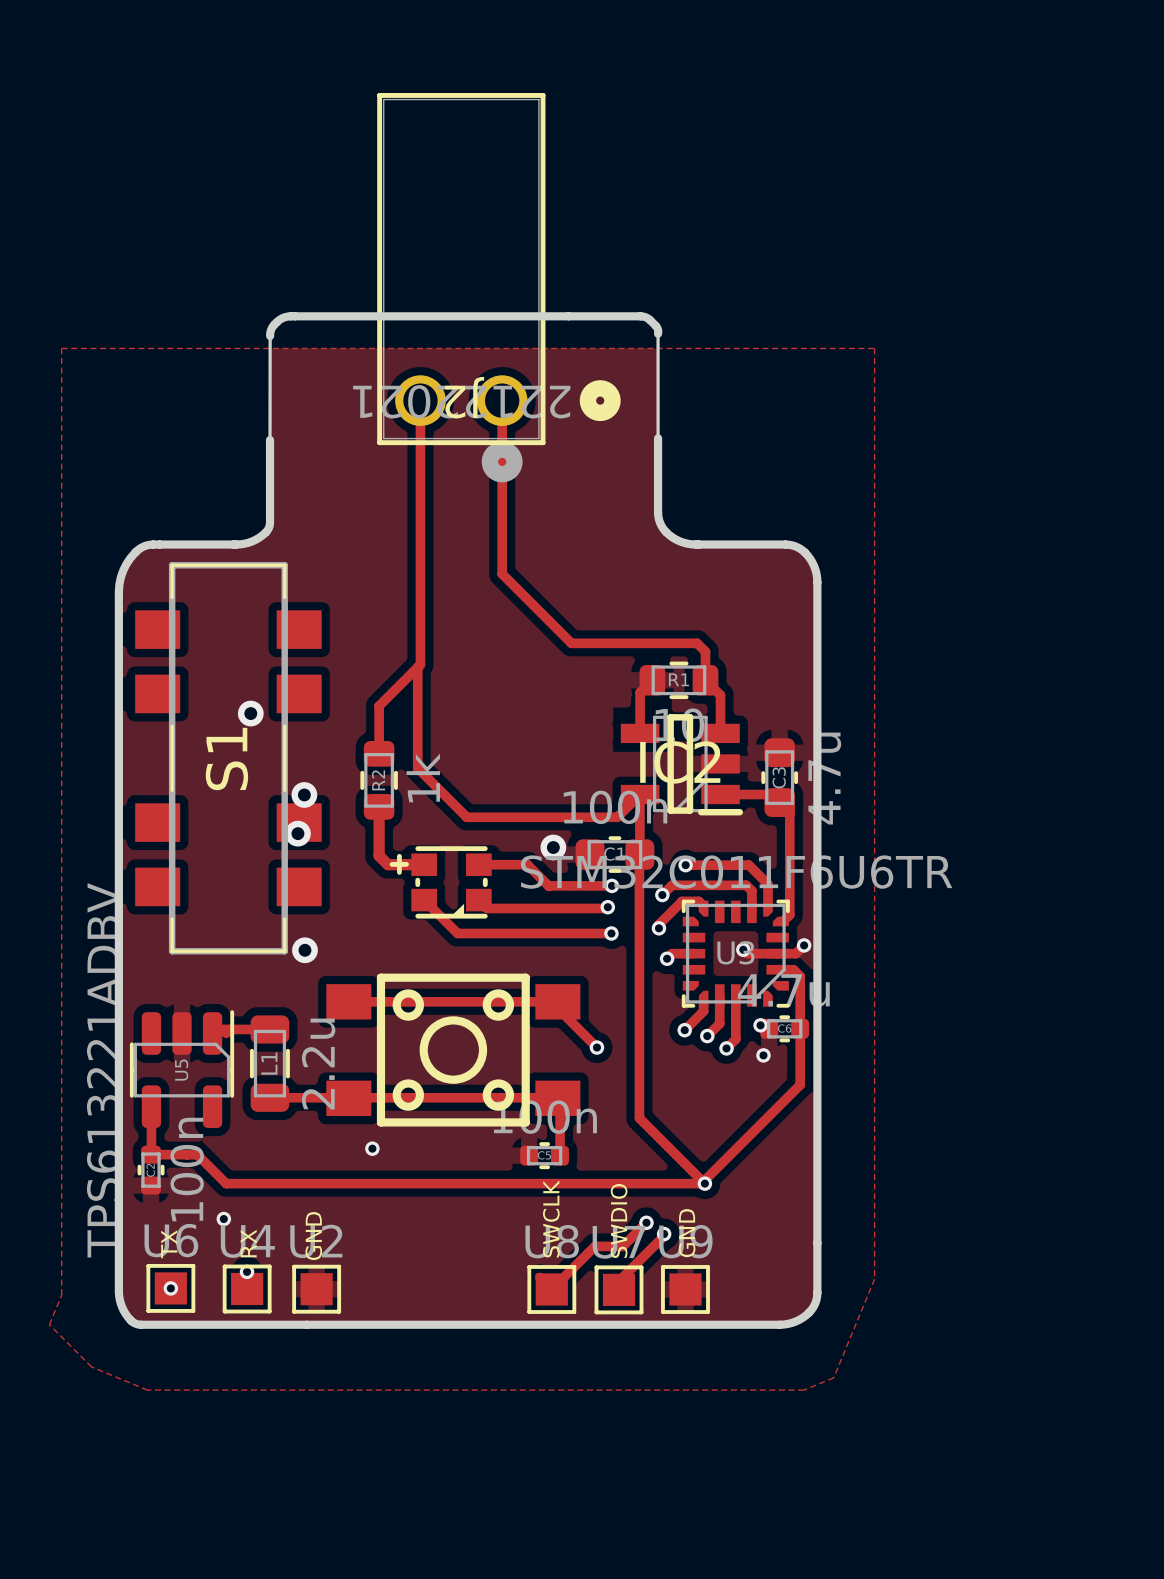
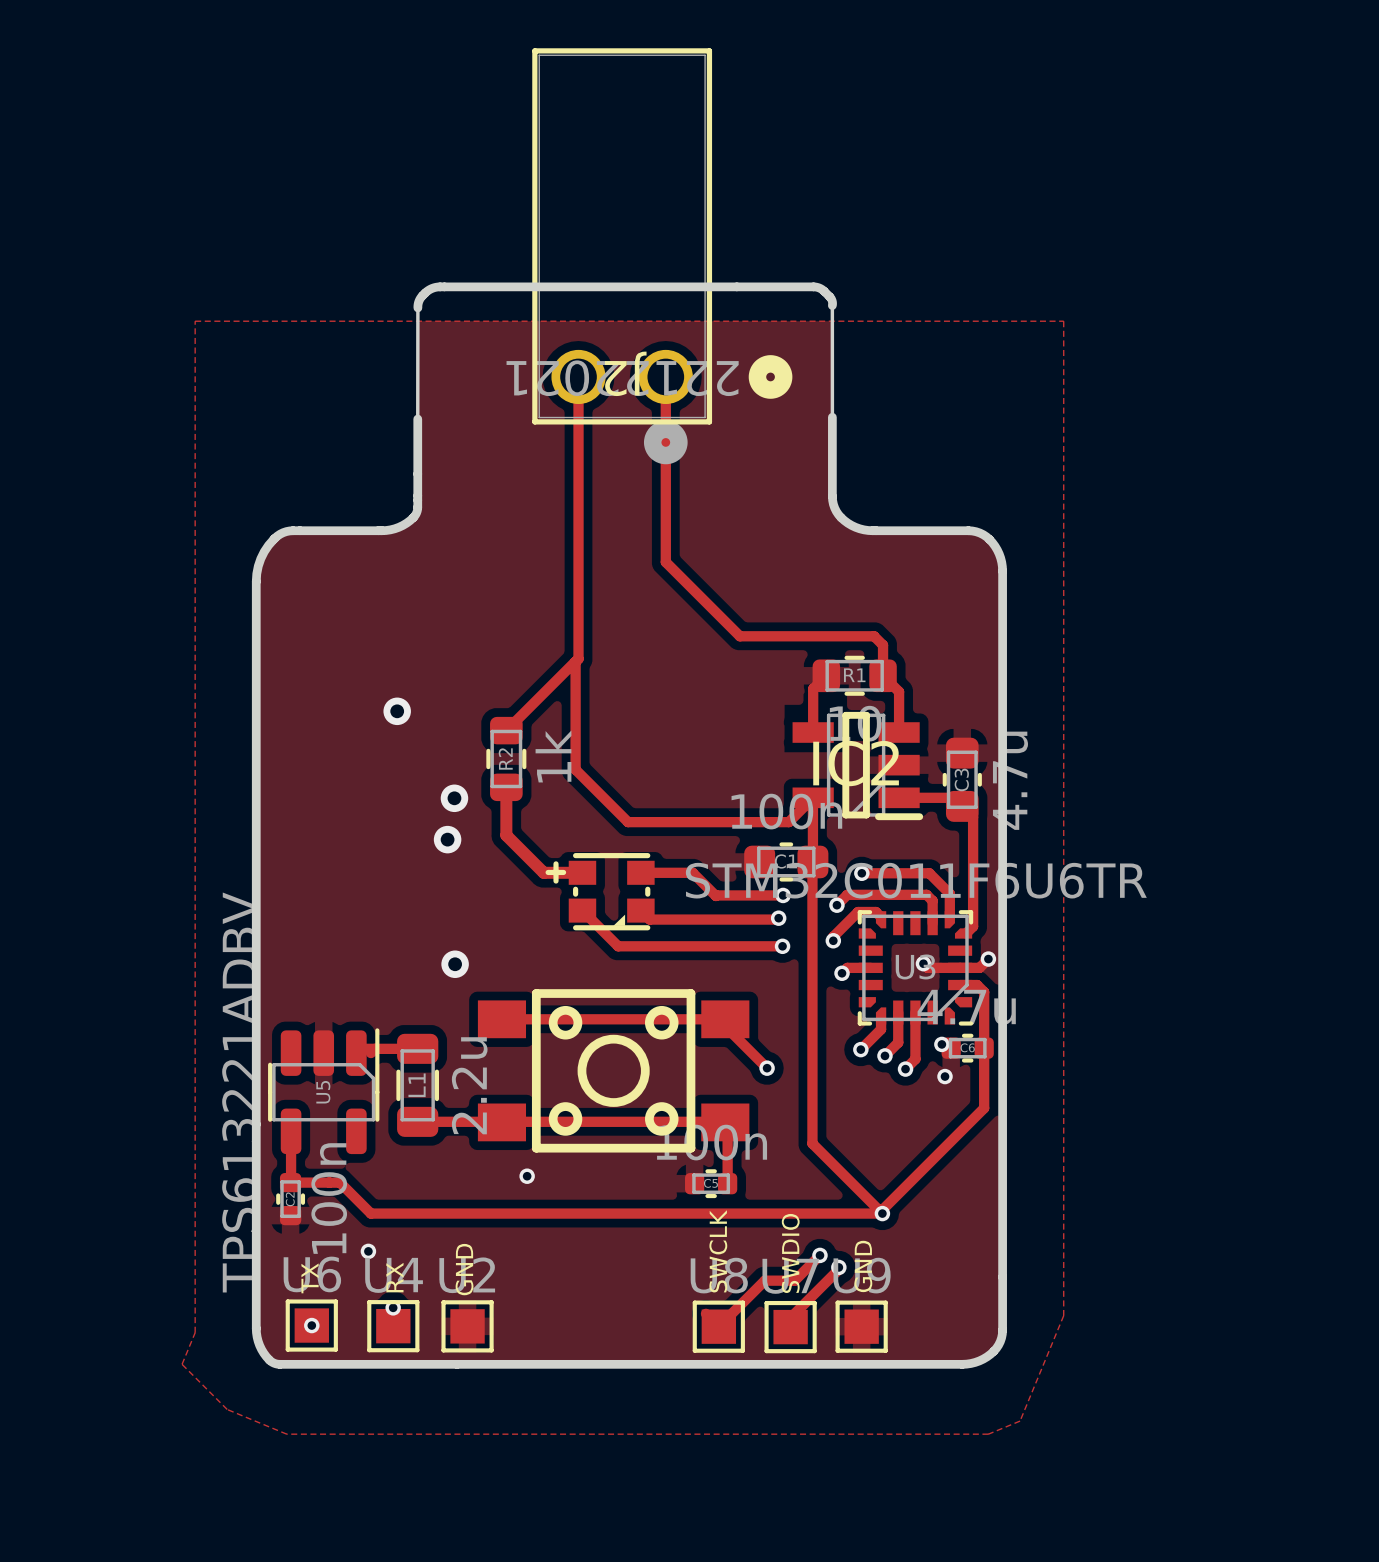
track: (417, 667) (379, 705) (379, 753) -> (575, 661) (506, 730)
S1: (228, 758) -> none
R2 position: (379, 780) -> (506, 758)
track: (379, 806) (379, 855) -> (506, 787) (506, 835) (534, 863)
via: (553, 847) -> none

